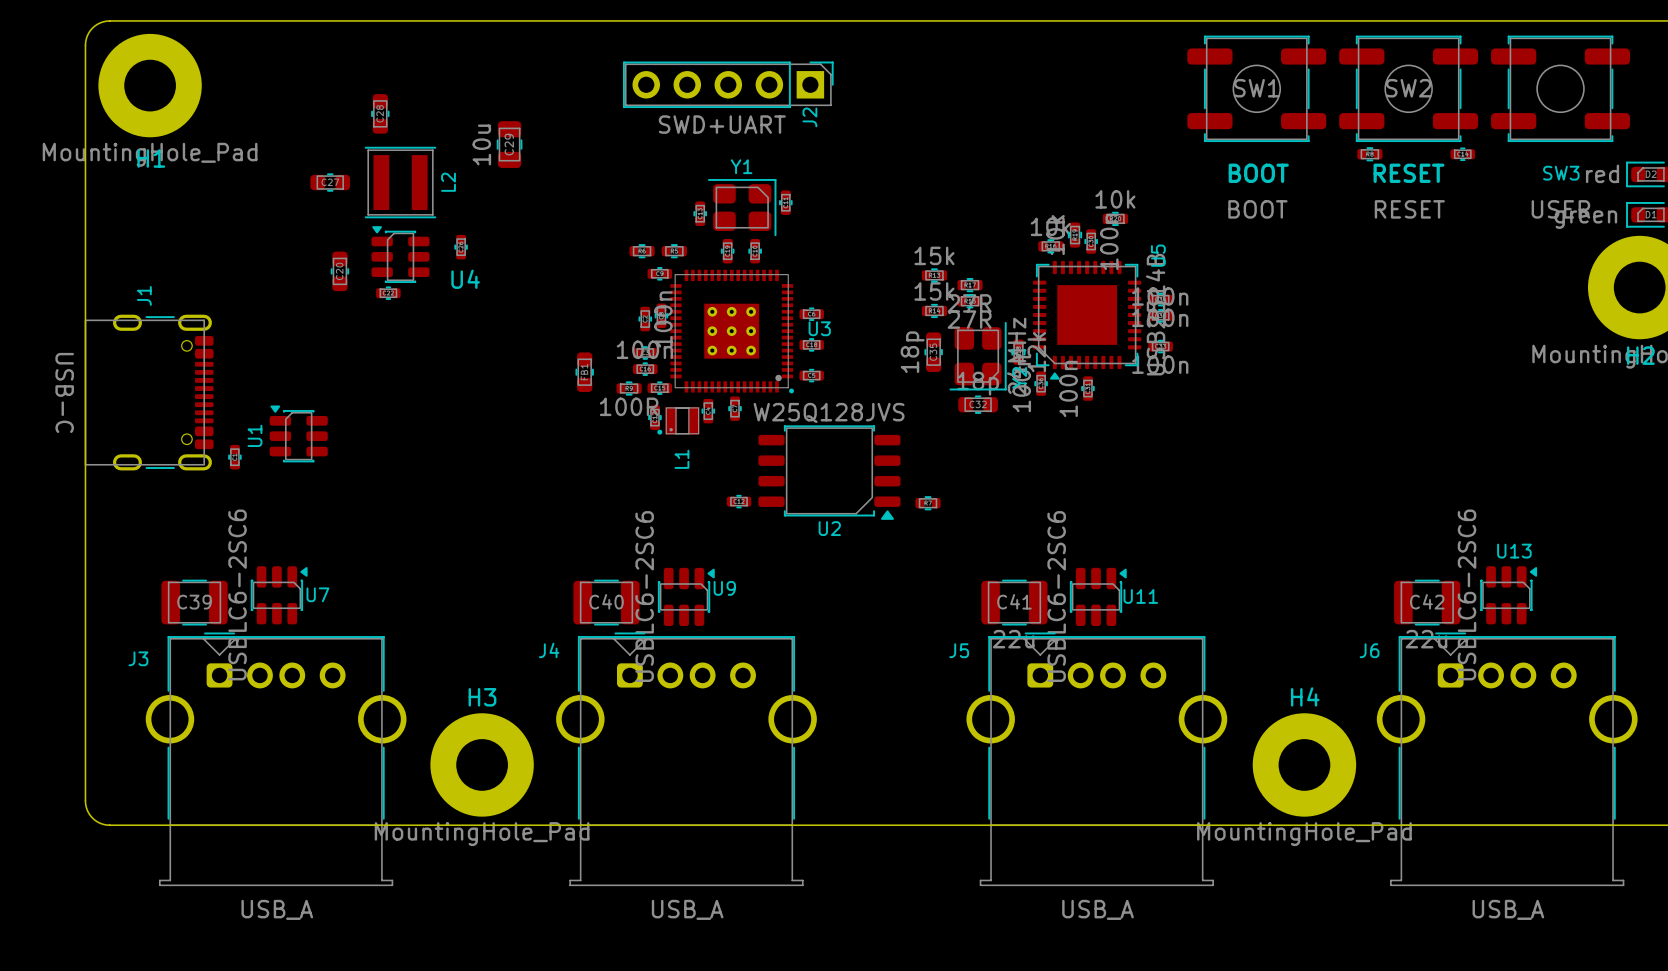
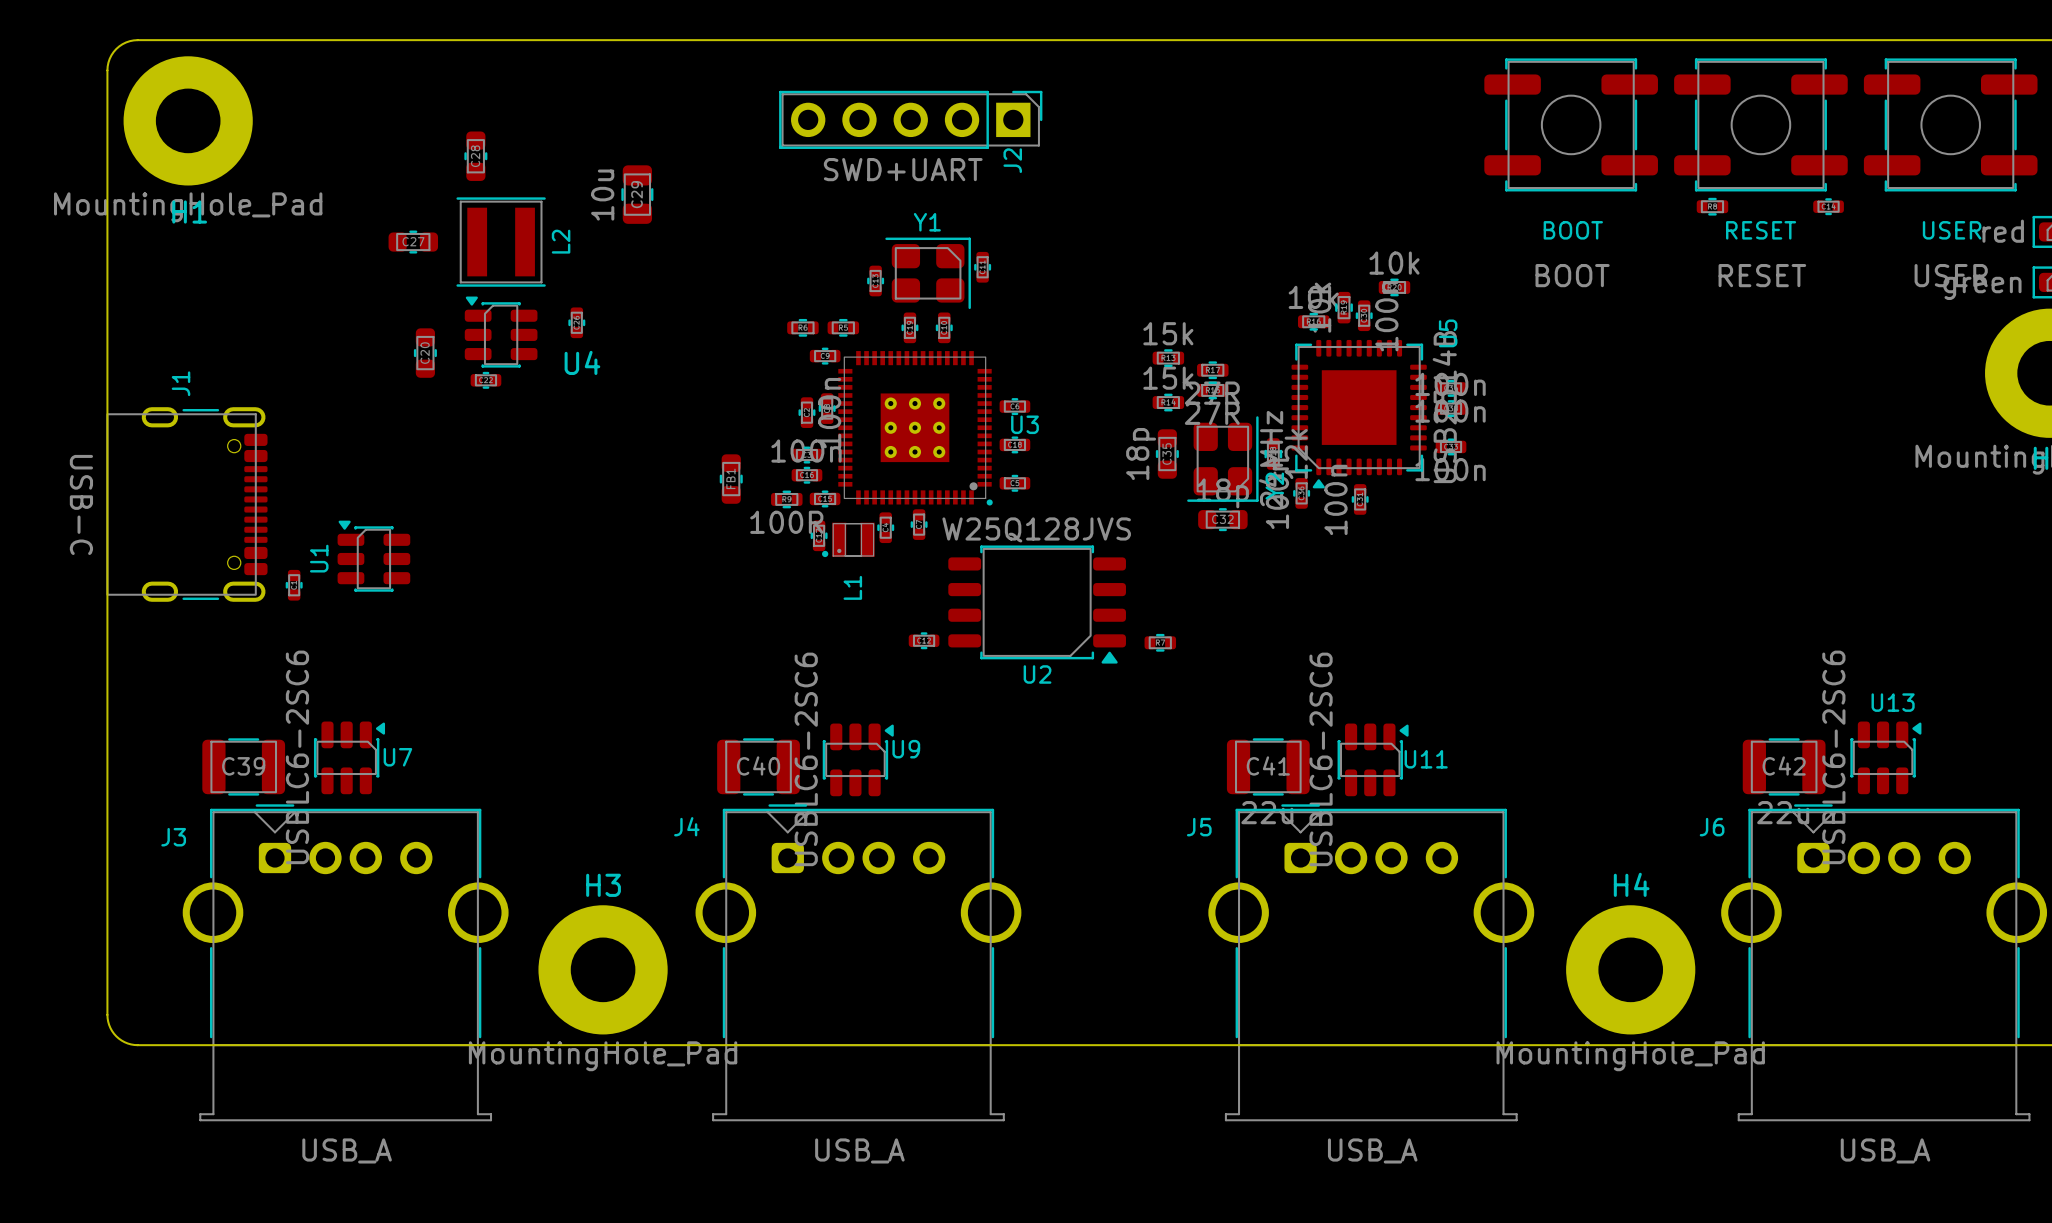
SW1 name: SW1 (1256, 88) -> BOOT (1573, 230)
SW2 name: SW2 (1408, 88) -> RESET (1761, 230)
SW1 text: BOOT (1258, 173) -> none
SW2 text: RESET (1409, 173) -> none
SW3 name: SW3 (1561, 173) -> USER (1952, 230)

